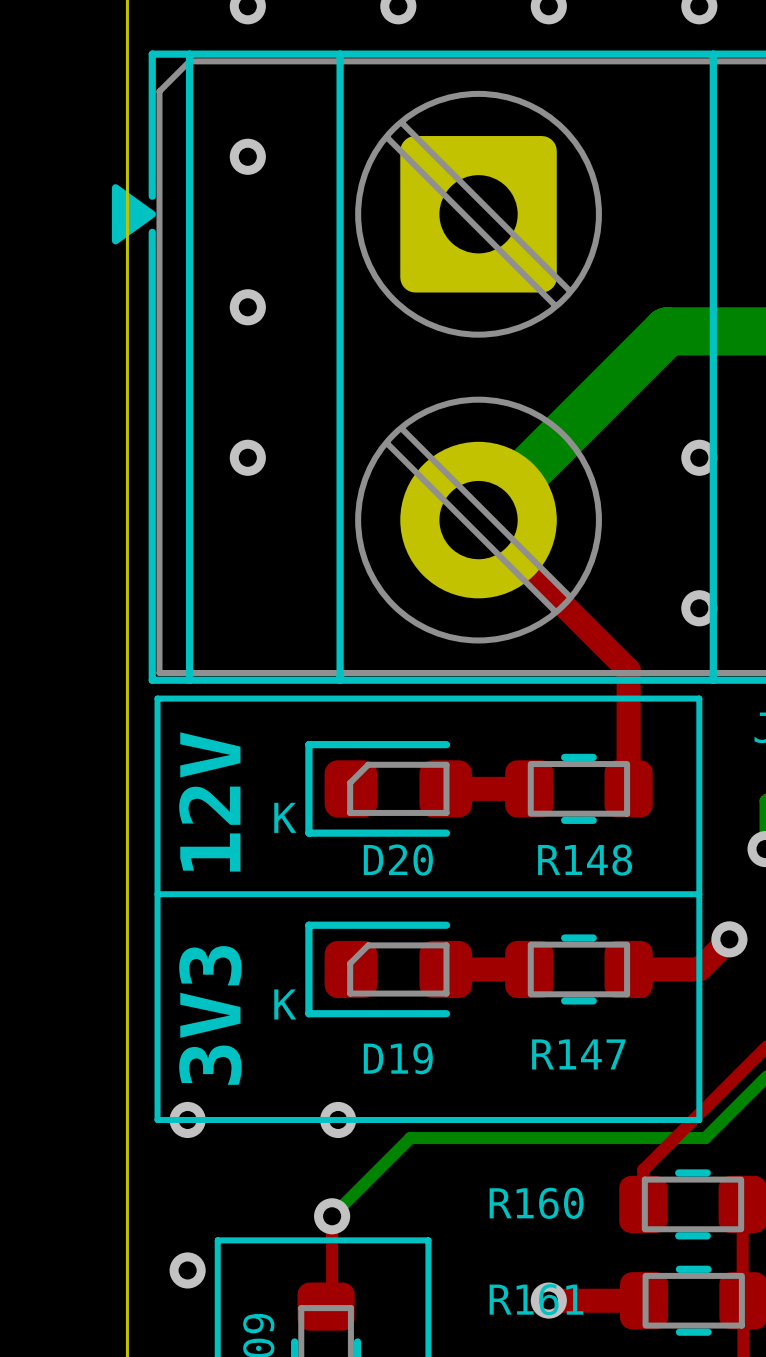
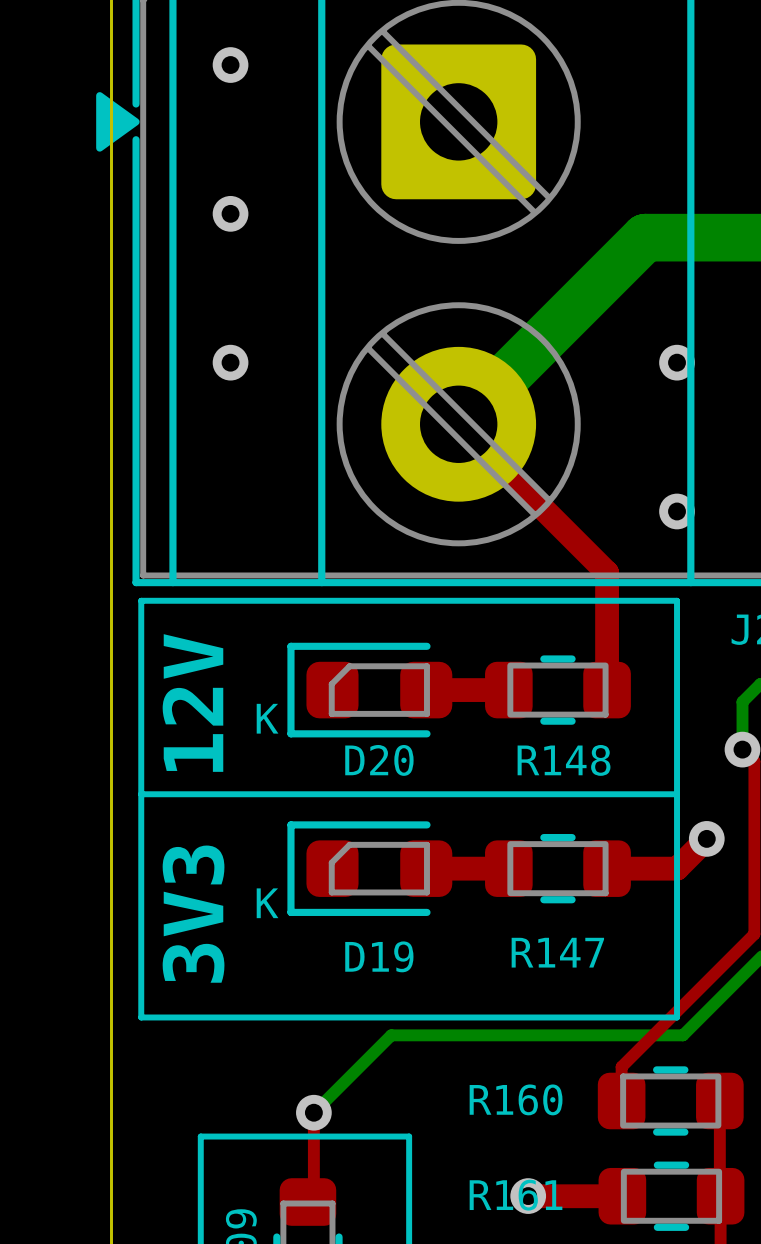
via: (187, 1119) -> none
via: (338, 1119) -> none
via: (187, 1270) -> none

